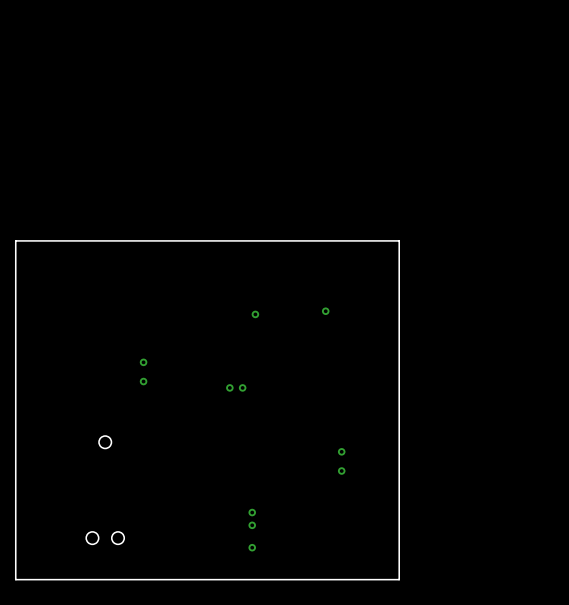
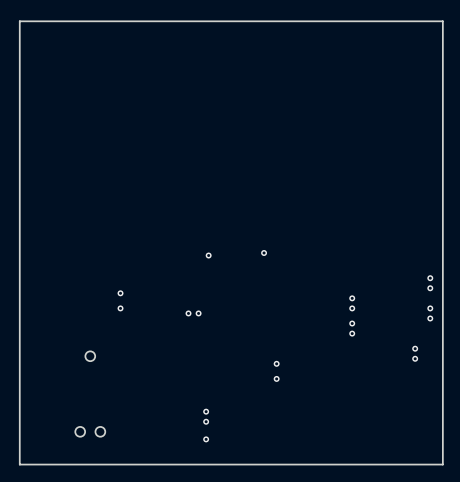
board edge: (15, 240) (399, 240) (399, 579) -> (19, 197) (19, 21) (442, 21) (442, 464) (321, 464)
via: none -> (430, 278)
via: none -> (430, 288)
via: none -> (352, 298)
via: none -> (352, 308)
via: none -> (430, 308)
via: none -> (430, 318)
via: none -> (352, 323)
via: none -> (352, 333)
via: none -> (415, 348)
via: none -> (415, 358)

